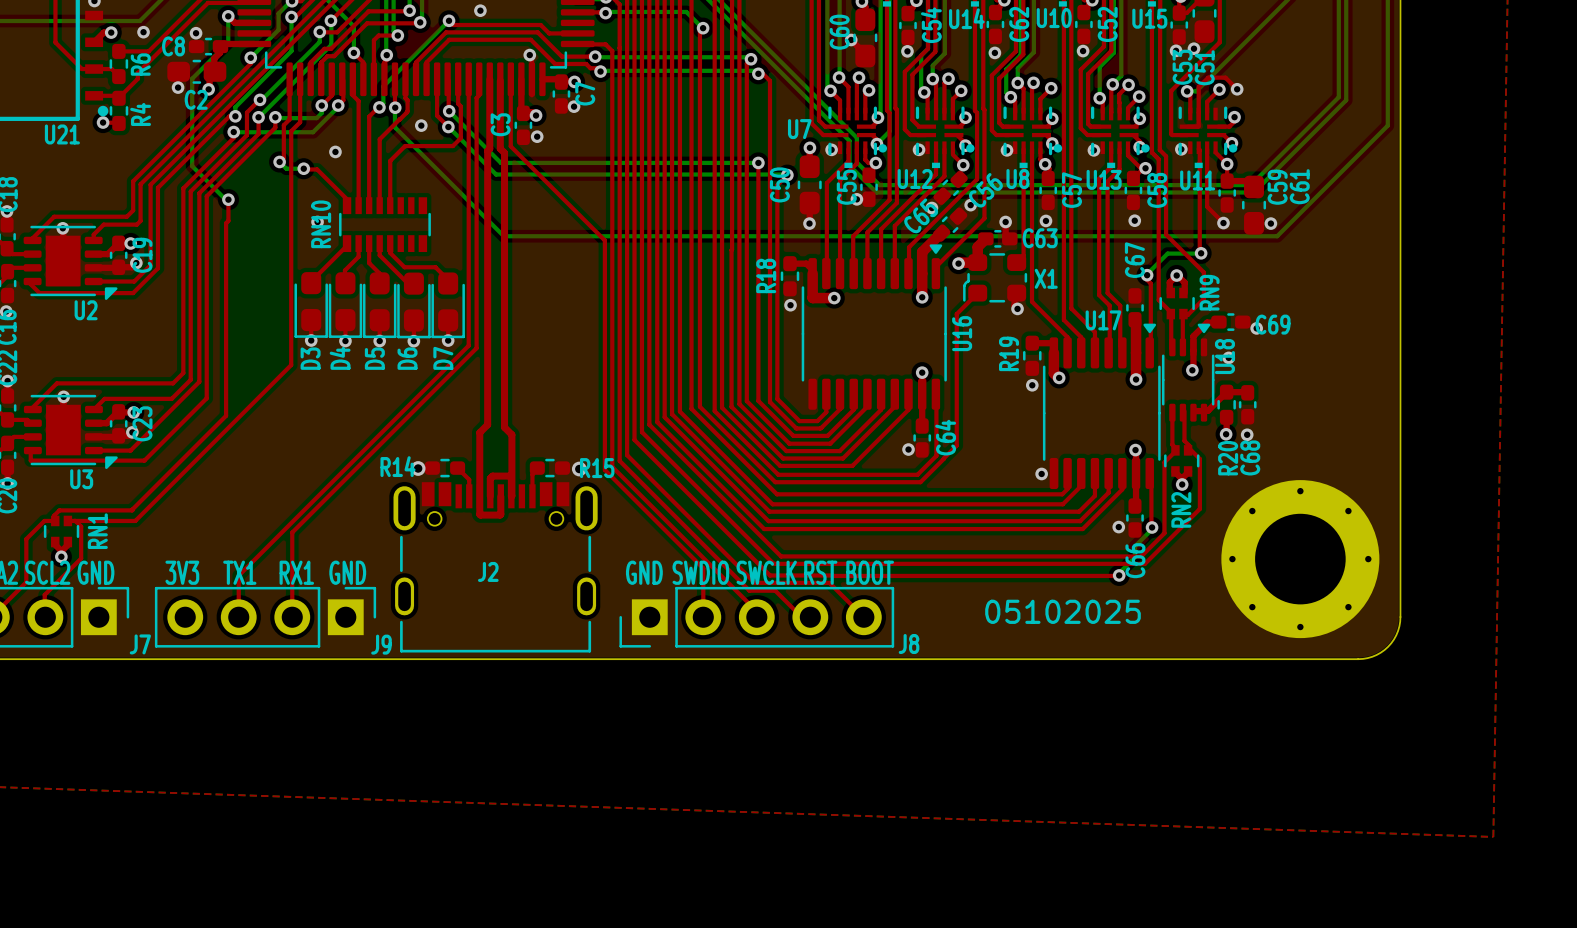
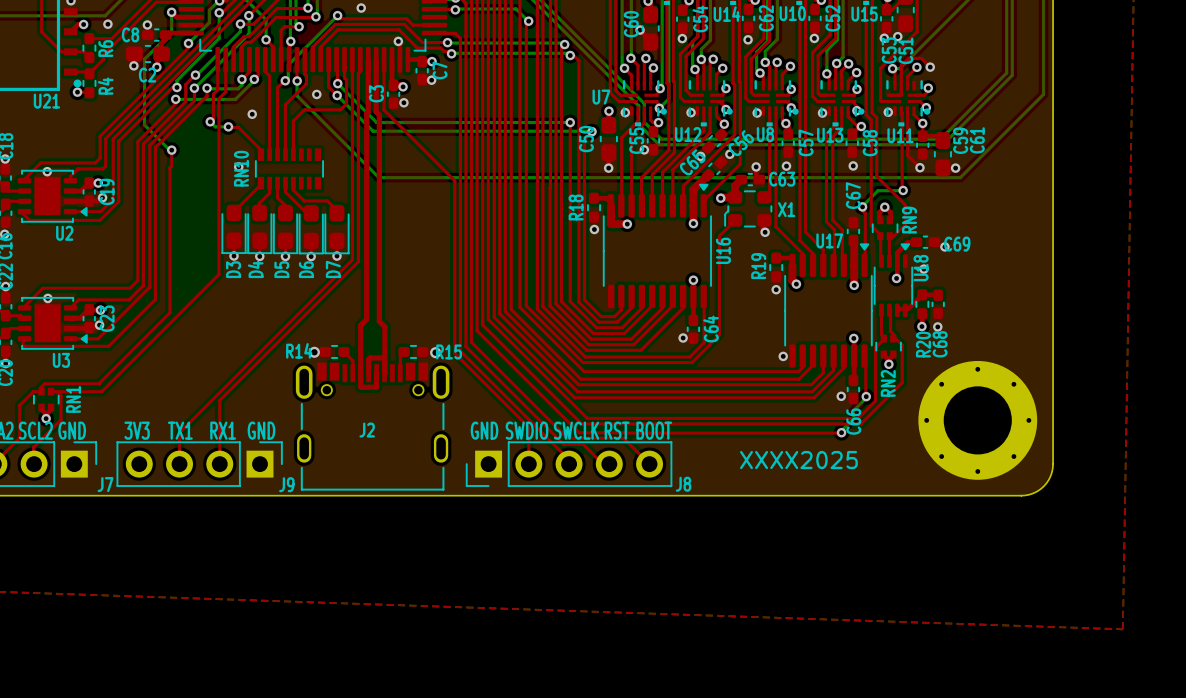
U2 footprint: [23, 225, 118, 300] -> [17, 169, 88, 223]
U3 footprint: [23, 394, 118, 470] -> [17, 296, 88, 350]
text: 05102025 (1063, 611) -> XXXX2025 (798, 460)

